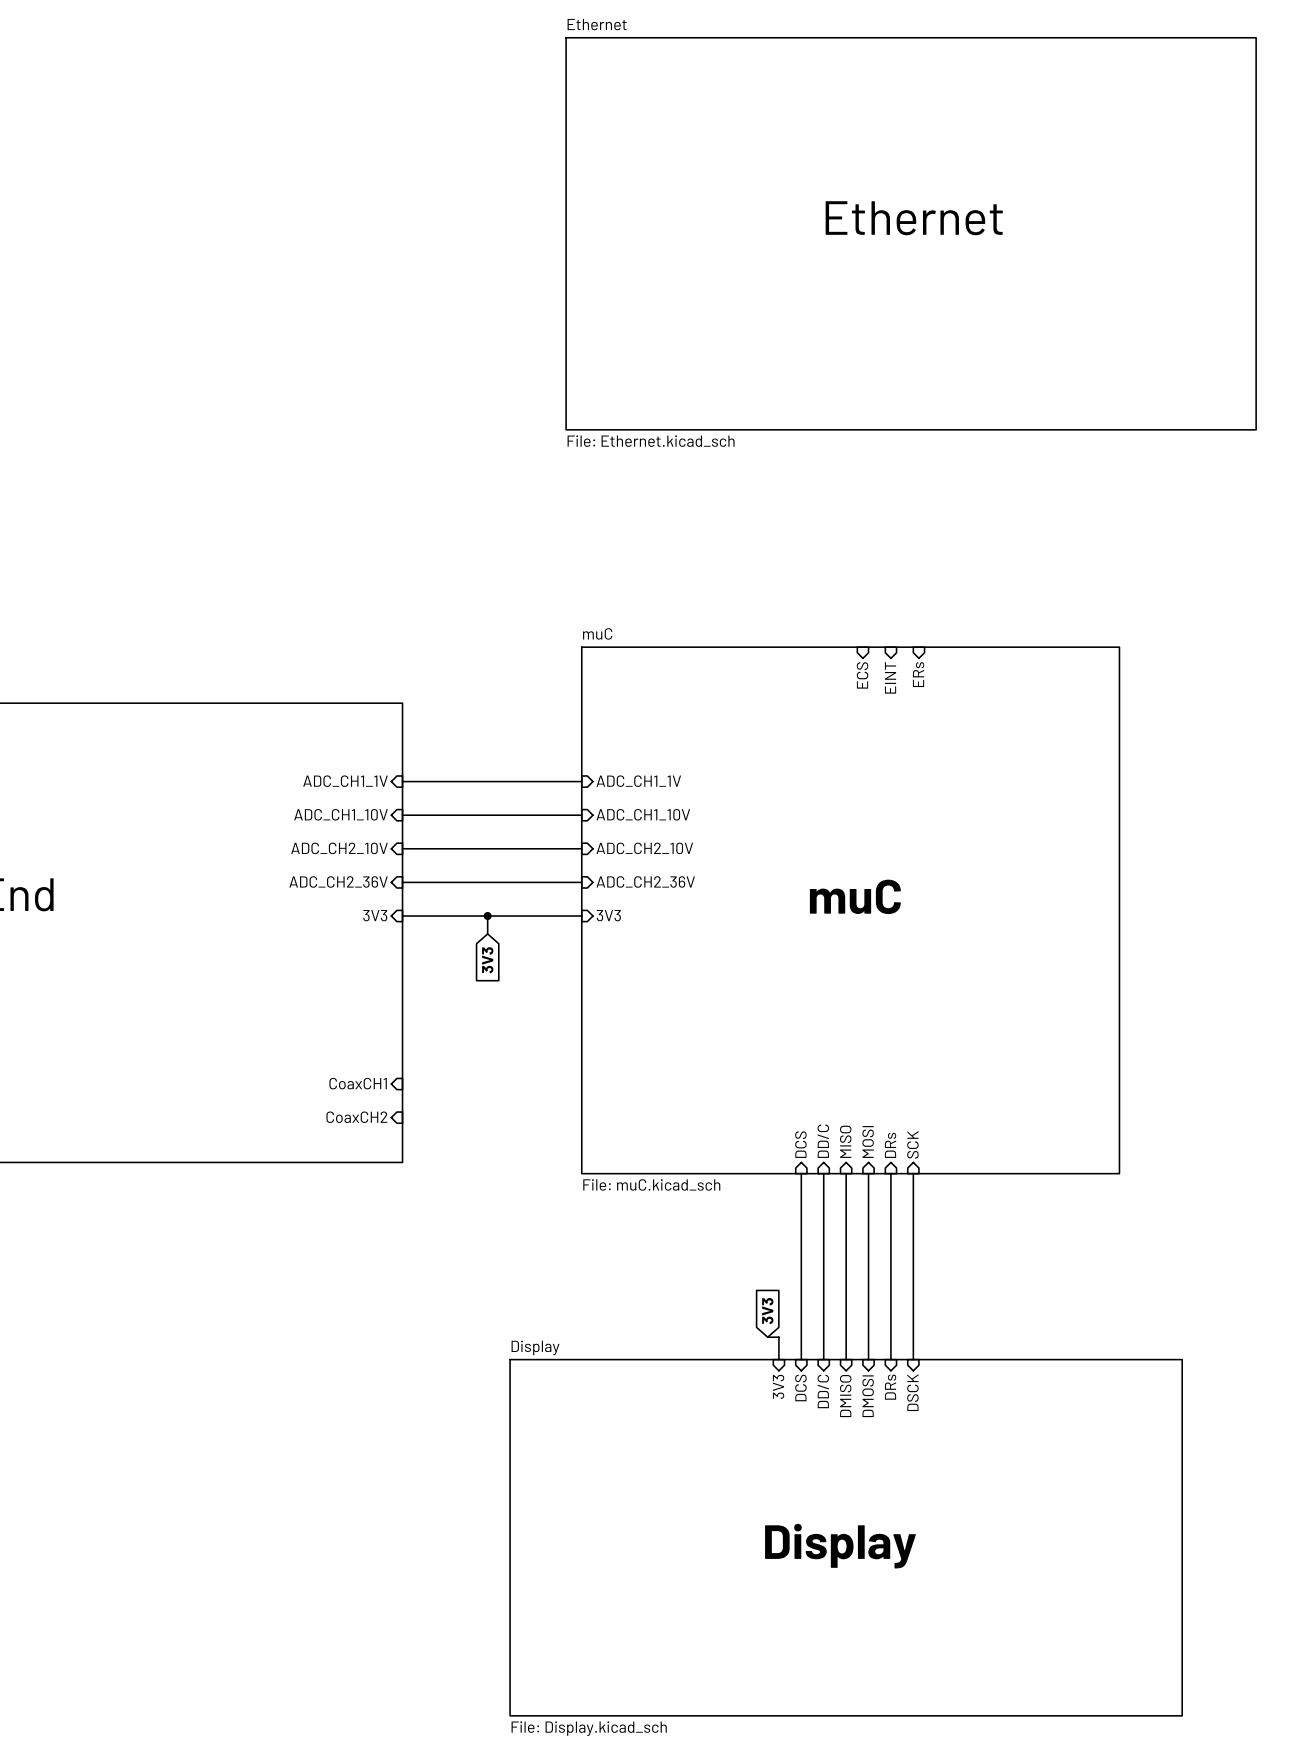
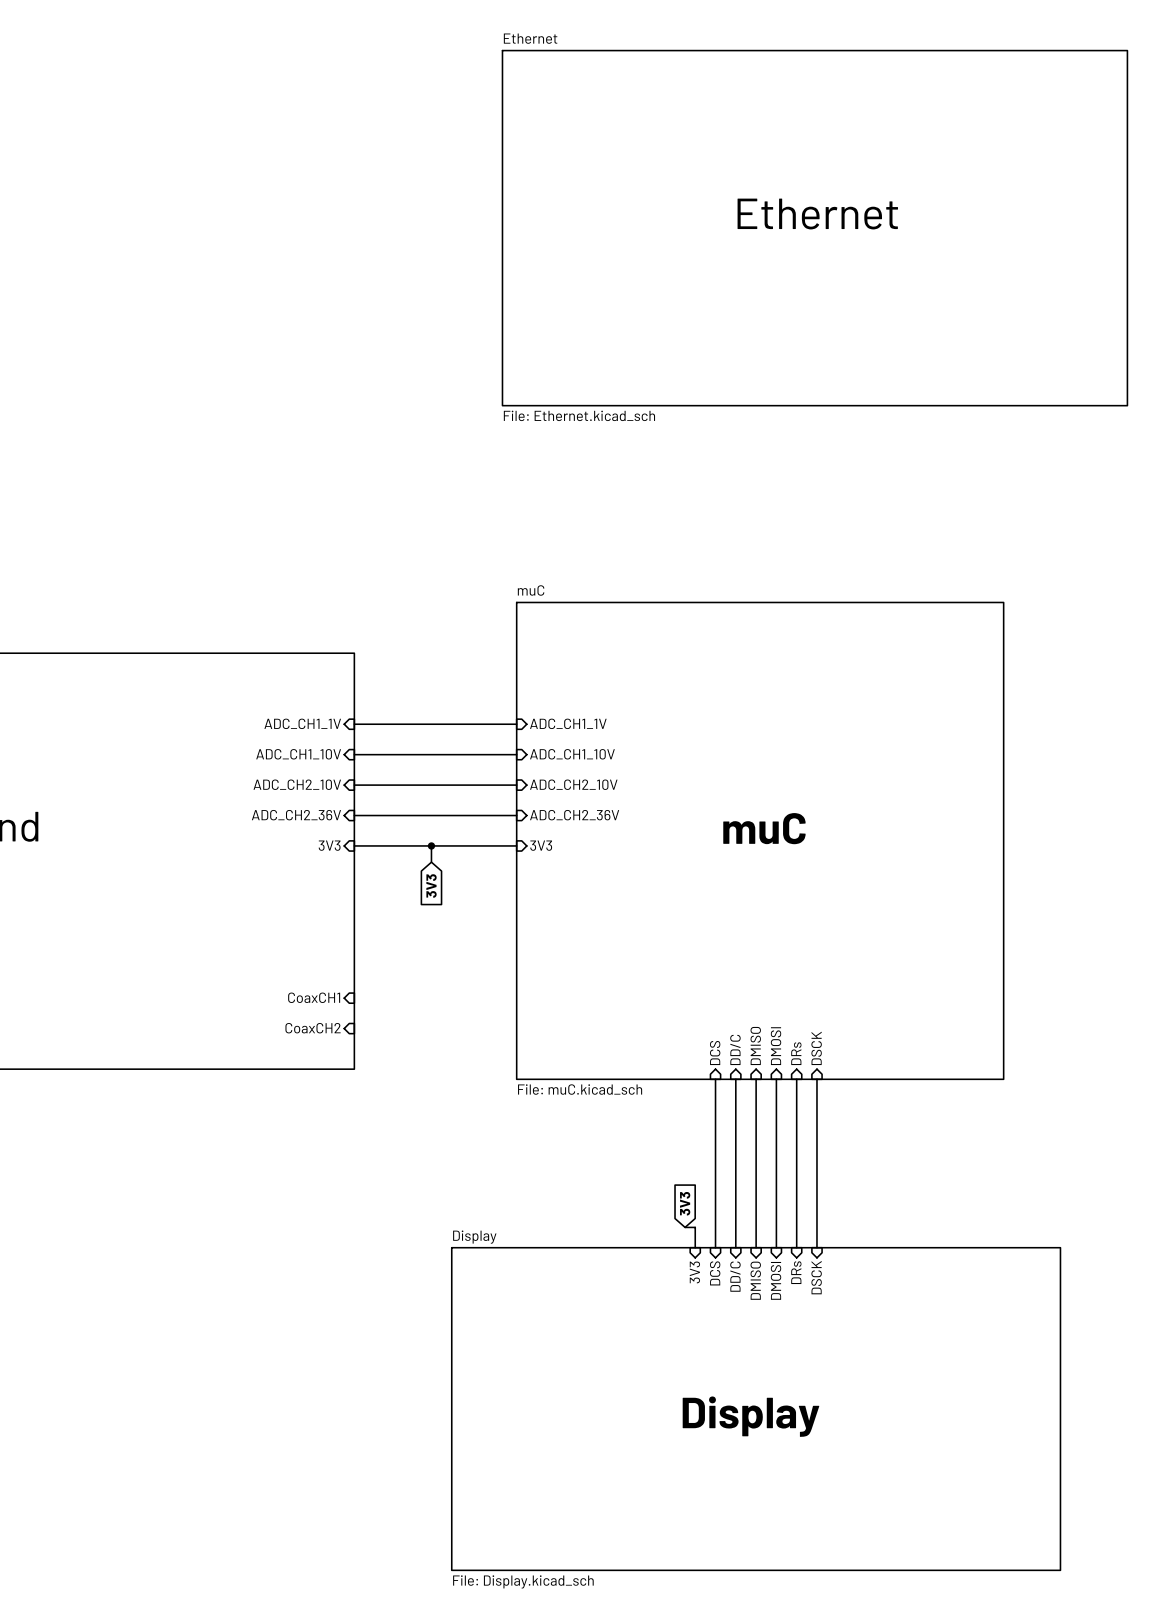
sheet pin: ERs (918, 674) -> none
sheet pin: ECS (862, 675) -> none
sheet pin: EINT (890, 677) -> none
sheet pin: MISO (845, 1141) -> DMISO (755, 1045)
sheet pin: MOSI (868, 1141) -> DMOSI (776, 1046)
sheet pin: SCK (912, 1144) -> DSCK (816, 1048)

